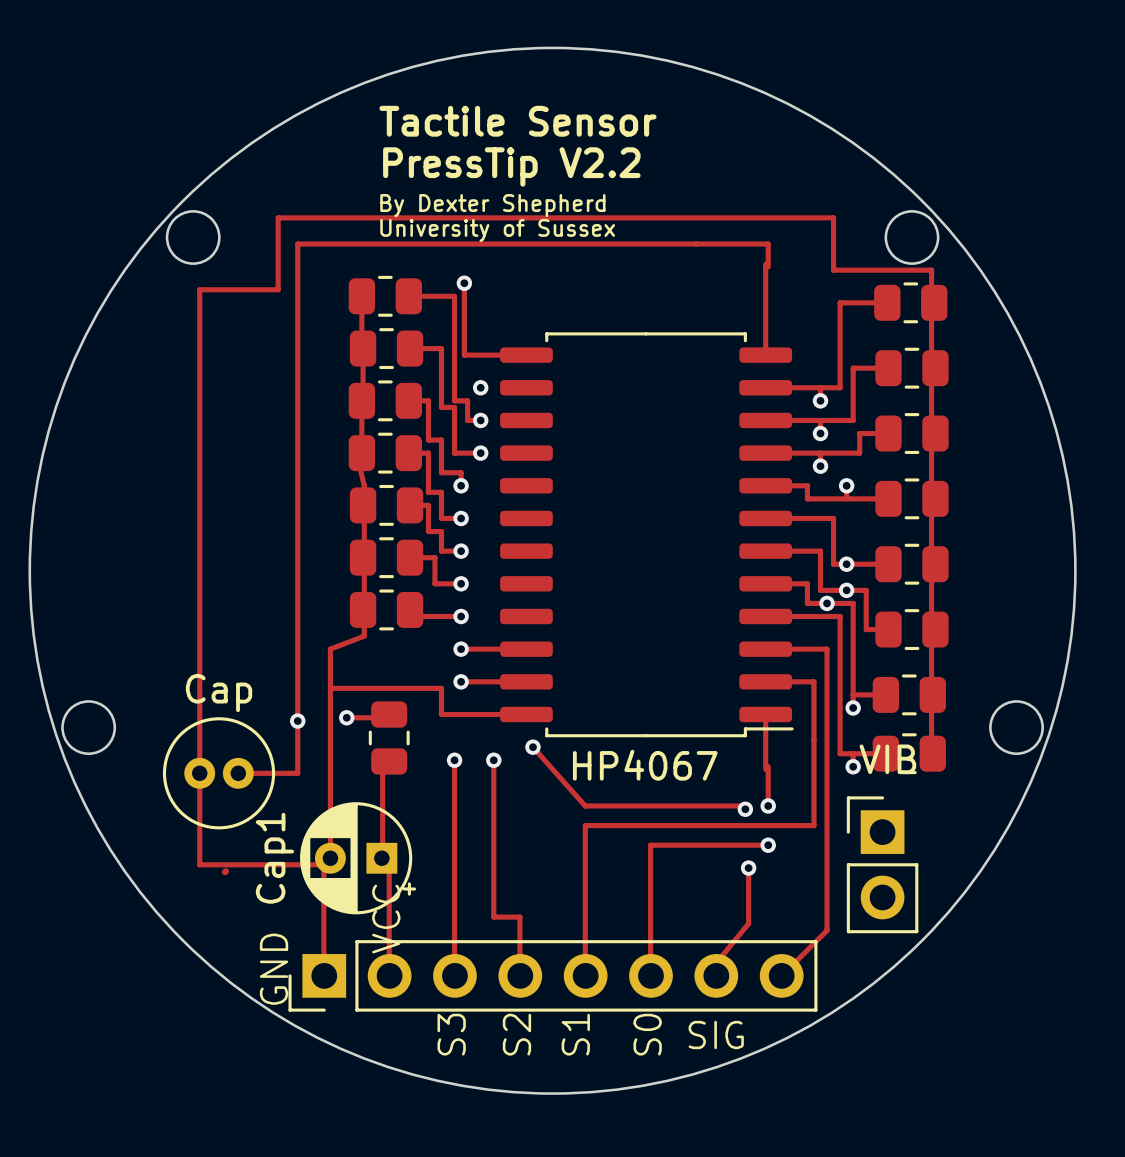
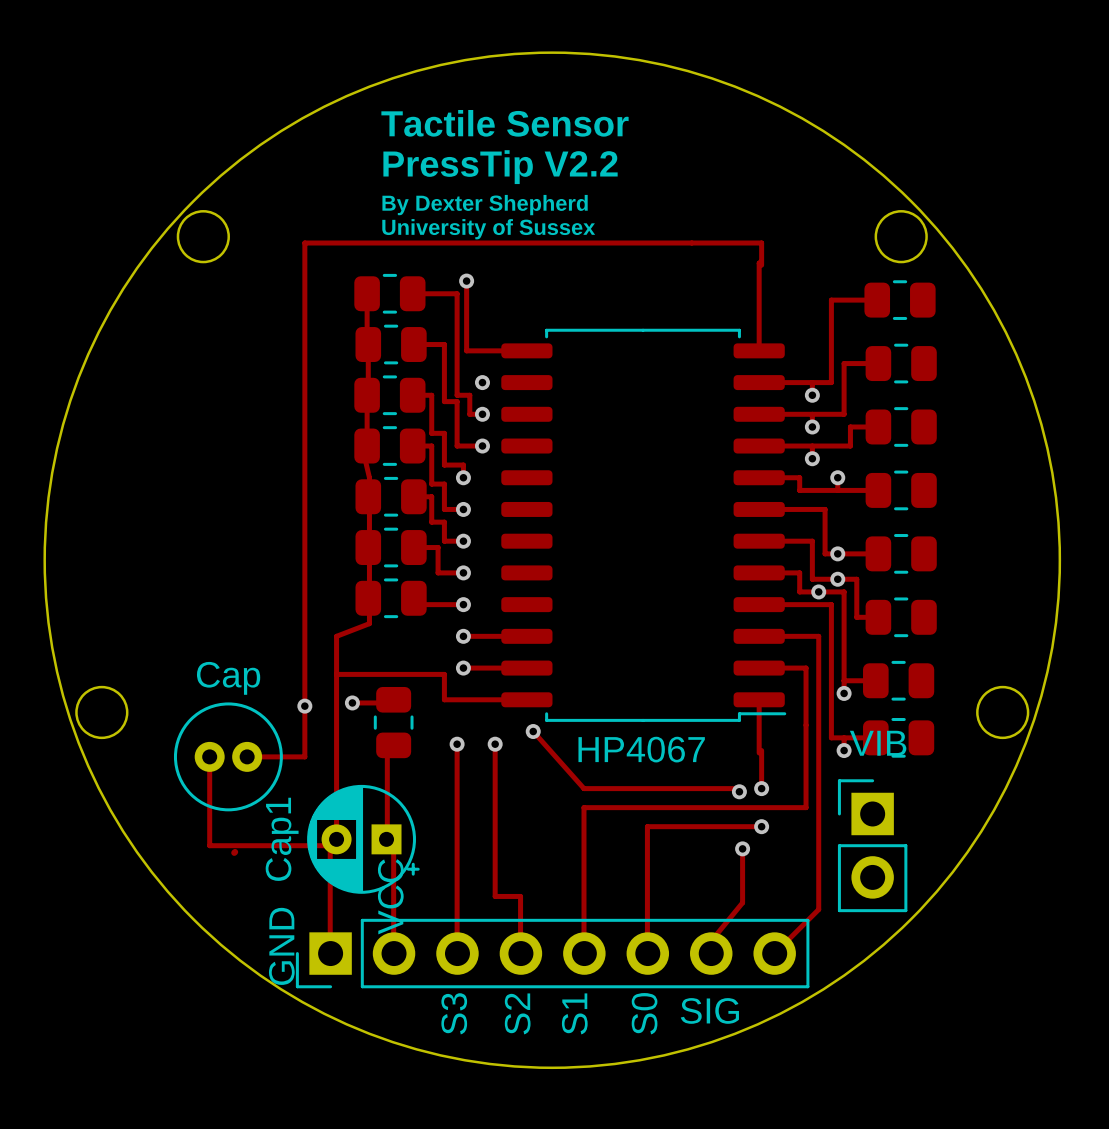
track: (931, 760) (931, 270) (833, 270) (833, 217) (278, 217) (278, 289) (199, 289) (199, 773) -> none

